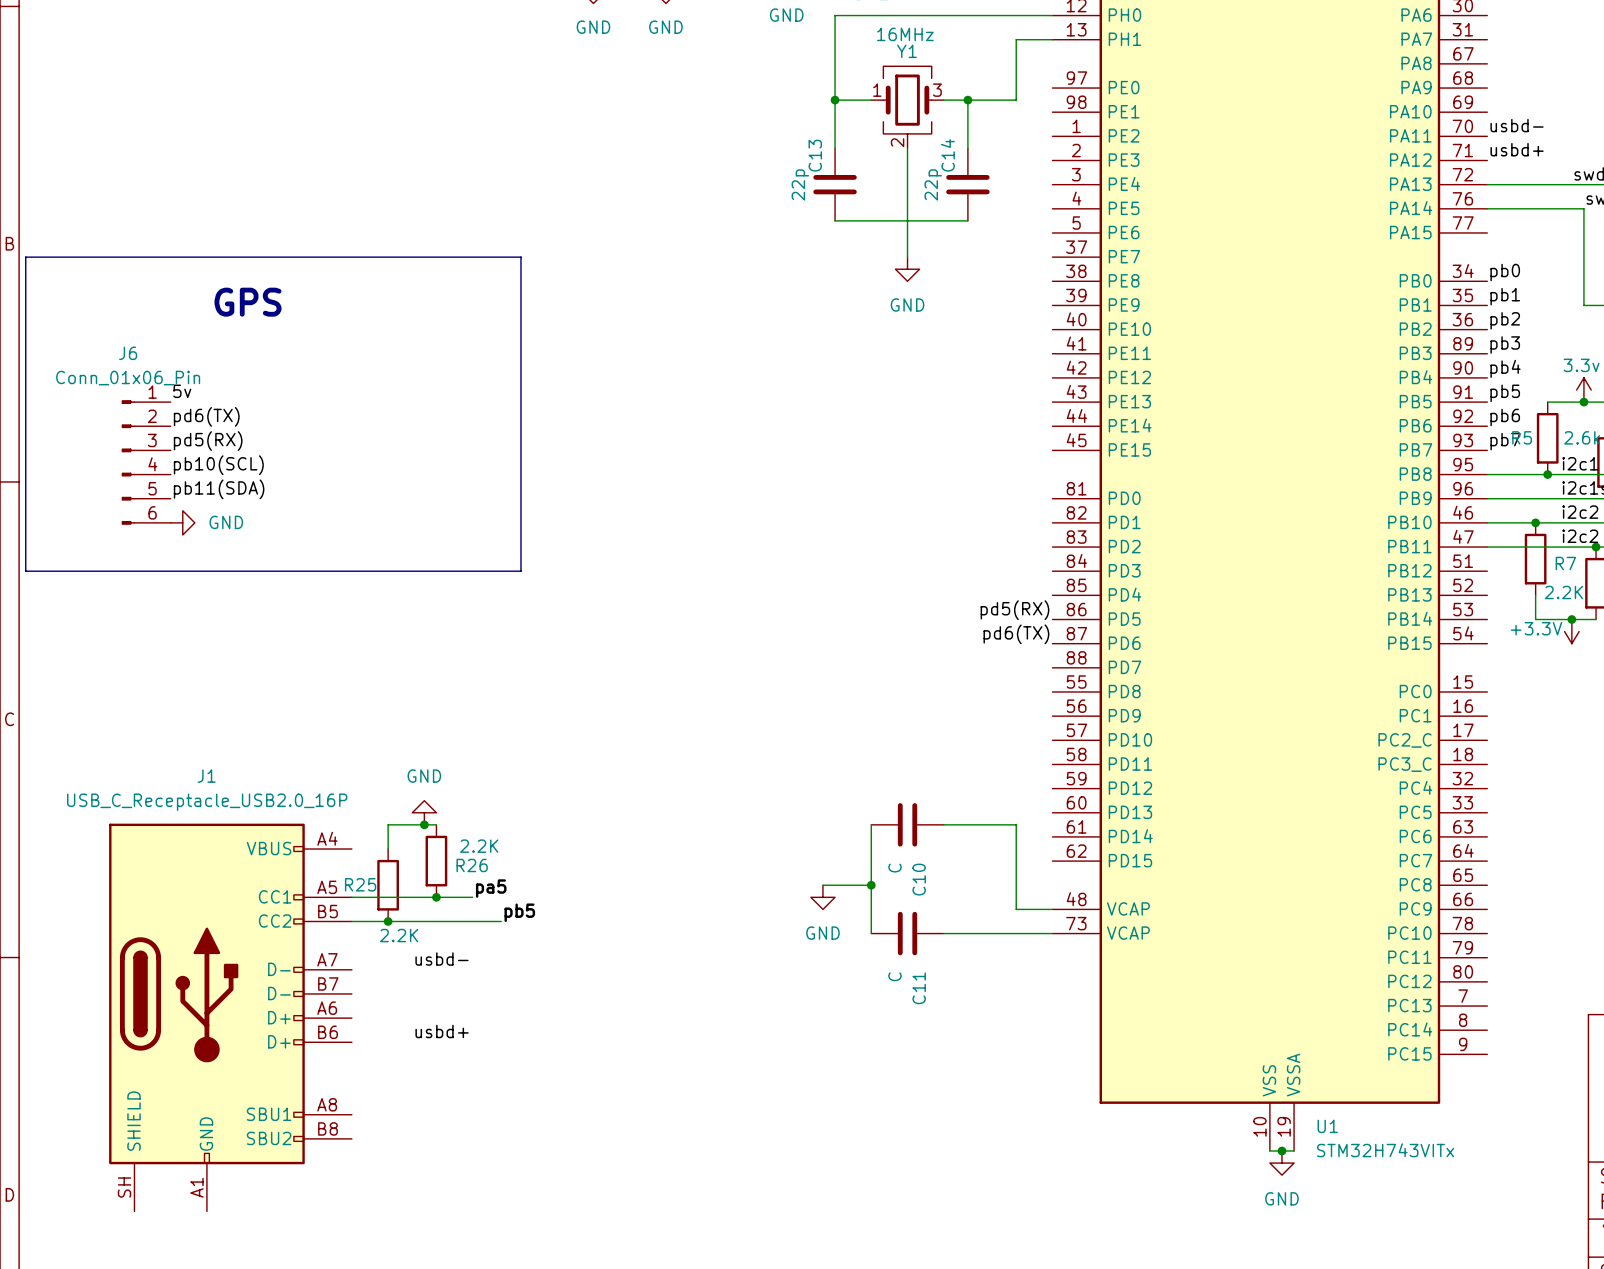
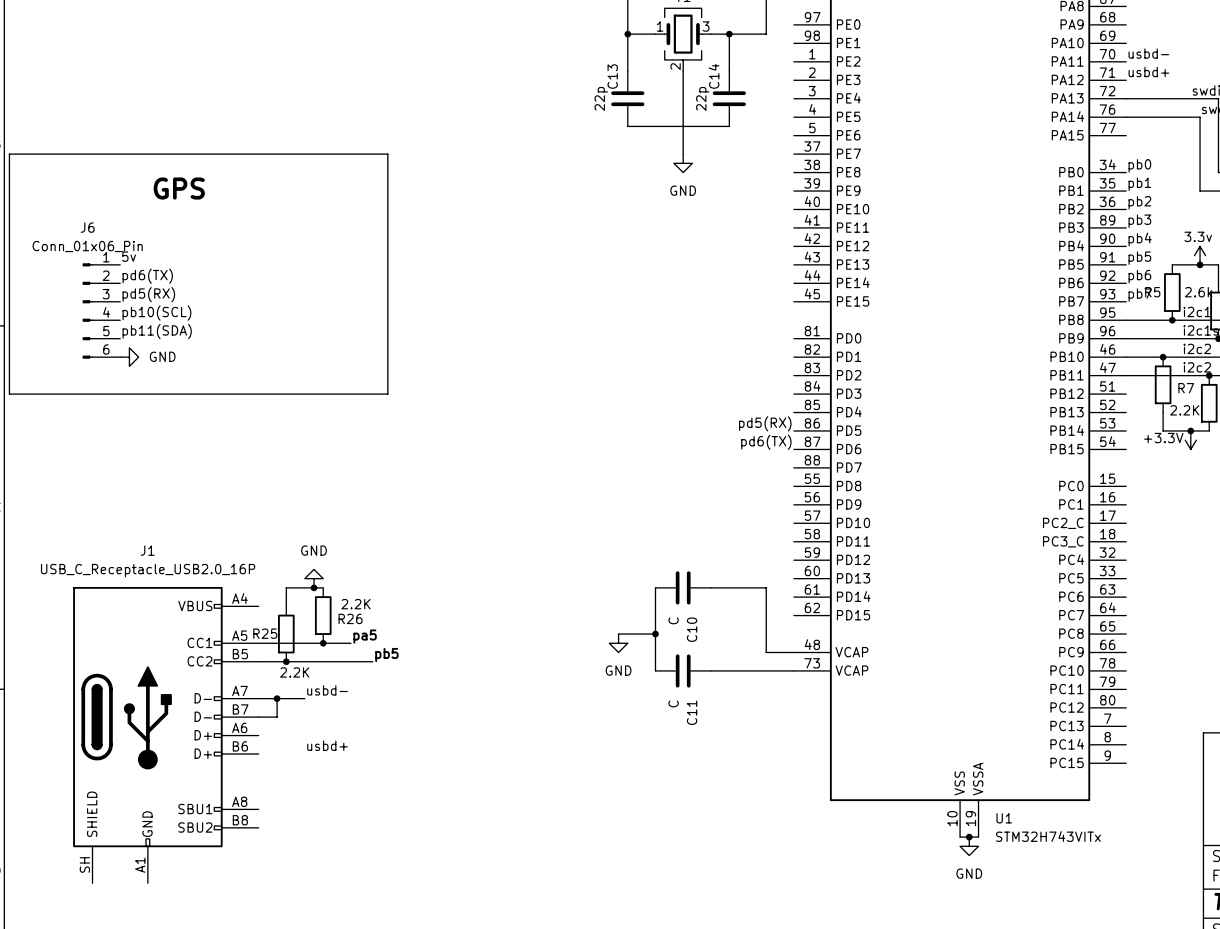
wire: none -> (258, 698) (304, 698)
wire: none -> (277, 698) (277, 717) (258, 717)
junction: none -> (277, 698)

